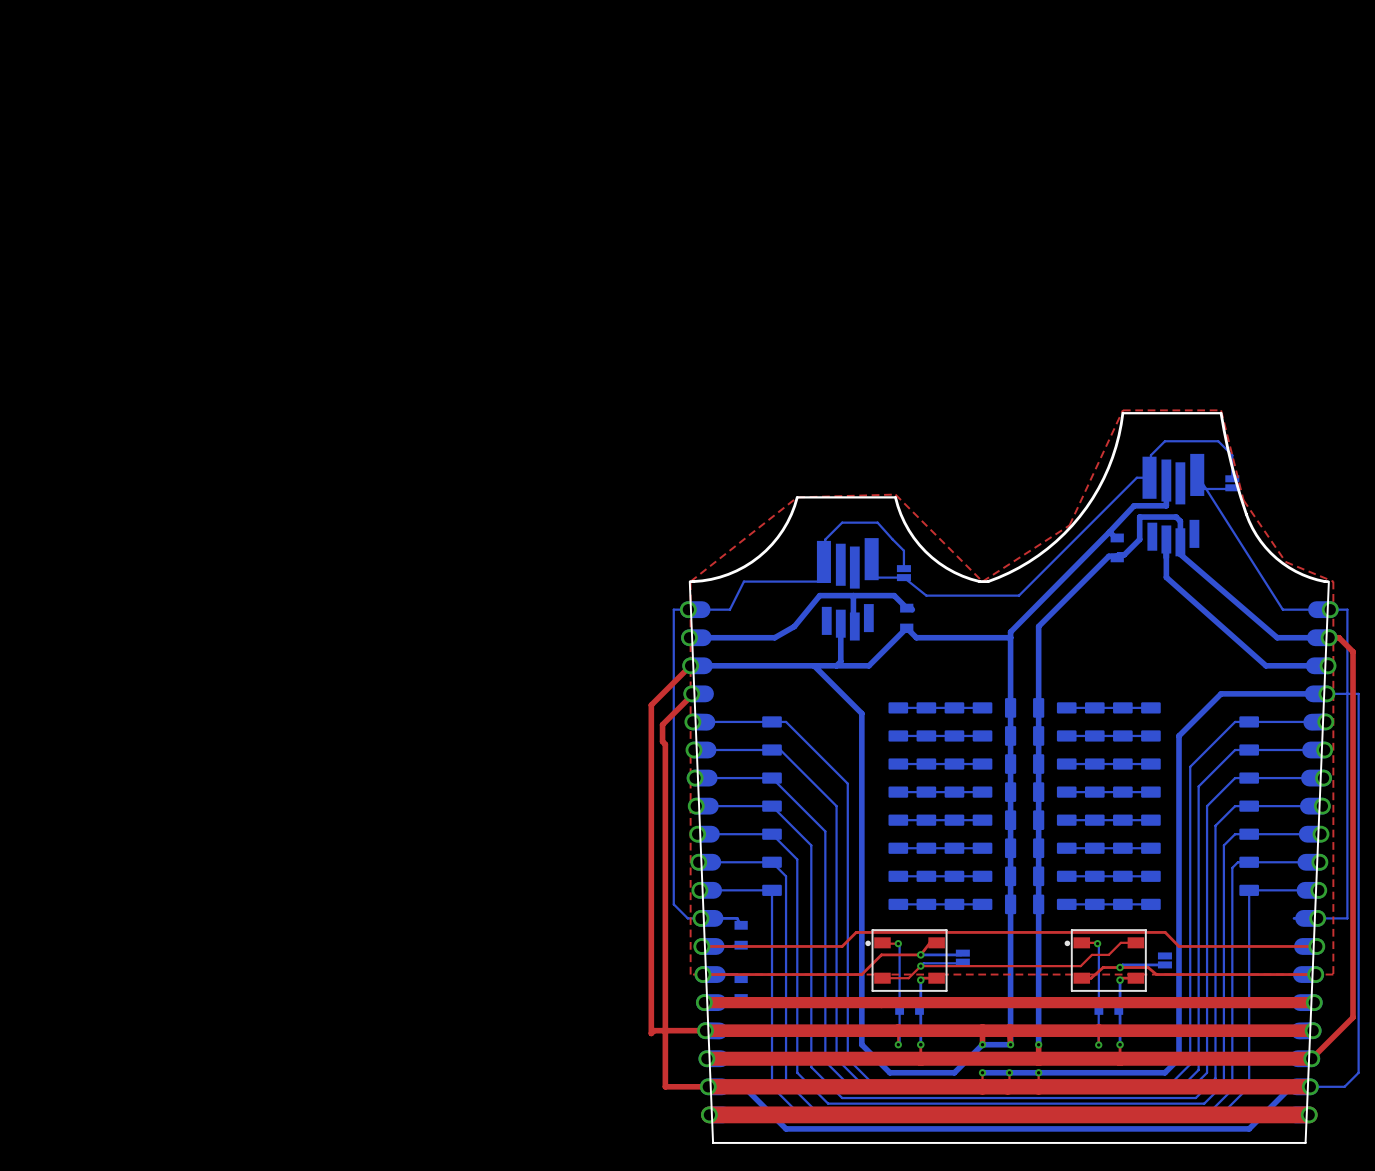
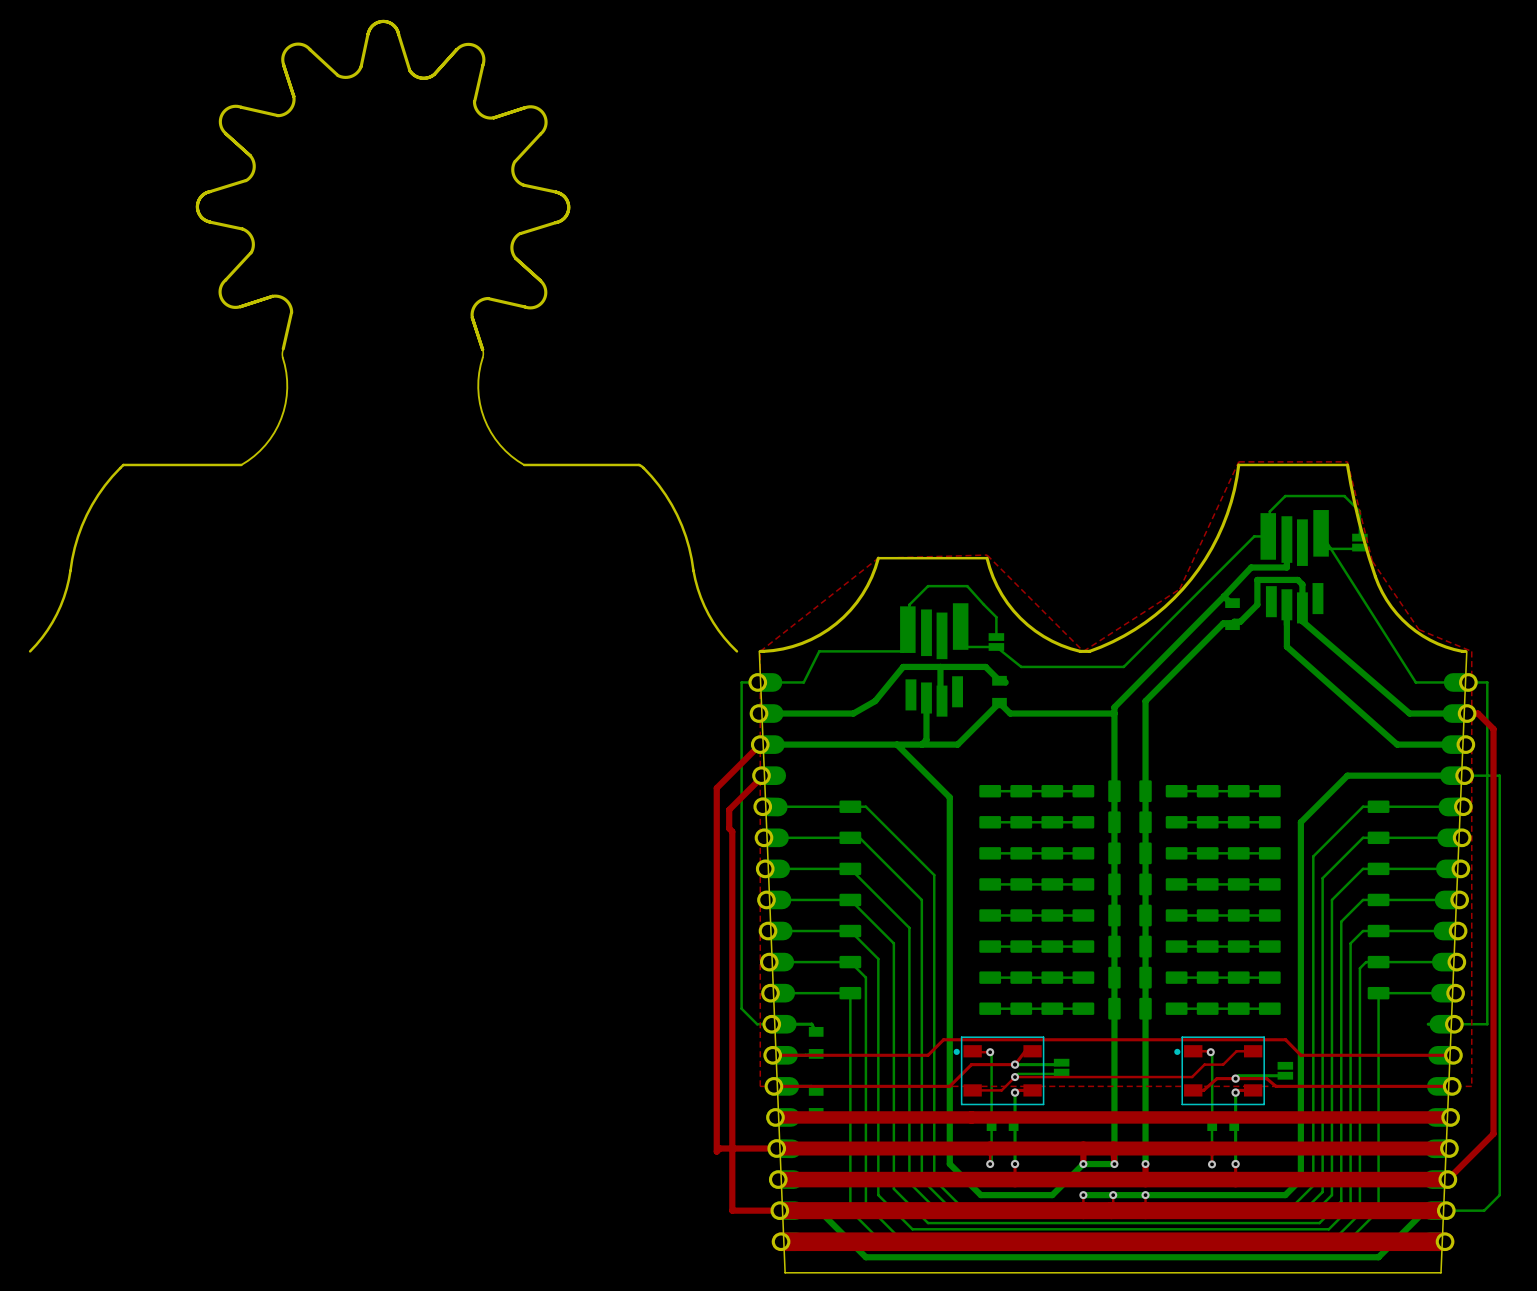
board edge: none -> (368, 33) (359, 70) (349, 77) (337, 75)
board edge: none -> (398, 34) (409, 69)
board edge: none -> (398, 34) (392, 24) (383, 21) (374, 24) (368, 34) (370, 28) (374, 24) (379, 21) (383, 21) (387, 21) (392, 24) (396, 28) (398, 34)
board edge: none -> (456, 49) (434, 74)
board edge: none -> (456, 49) (463, 45) (472, 44) (479, 48) (483, 55) (483, 63) (474, 101)
board edge: none -> (283, 64) (294, 100) (288, 111) (277, 115)
board edge: none -> (283, 64) (282, 56) (286, 49) (292, 45) (300, 44) (307, 47) (337, 74)
board edge: none -> (434, 74) (429, 77) (420, 78) (413, 74) (409, 70) (411, 73) (413, 74) (416, 76) (420, 78) (424, 78) (429, 77) (432, 75) (434, 74)
board edge: none -> (474, 101) (478, 112) (489, 118) (525, 107)
board edge: none -> (525, 107) (533, 106) (540, 110) (544, 116) (545, 124) (543, 131) (515, 161)
board edge: none -> (277, 115) (239, 106) (231, 106) (224, 110) (220, 117) (221, 127) (225, 133)
board edge: none -> (225, 133) (252, 159) (253, 171) (246, 180)
board edge: none -> (514, 161) (513, 173) (519, 183) (556, 192)
board edge: none -> (245, 180) (210, 191)
board edge: none -> (210, 191) (200, 197) (197, 206) (200, 215) (210, 222) (204, 219) (200, 215) (197, 210) (197, 206) (197, 202) (200, 197) (204, 193) (210, 191)
board edge: none -> (209, 222) (246, 230) (252, 240) (251, 252)
board edge: none -> (555, 222) (520, 233)
board edge: none -> (555, 222) (565, 216) (568, 207) (565, 198) (556, 192) (561, 194) (565, 198) (568, 203) (568, 207) (568, 211) (565, 216) (561, 220) (555, 222)
board edge: none -> (520, 233) (512, 242) (513, 254) (540, 280)
board edge: none -> (250, 253) (223, 282) (220, 290) (221, 297) (225, 304) (232, 307) (240, 306)
board edge: none -> (540, 280) (544, 287) (545, 296) (541, 303) (534, 307) (526, 307) (489, 298)
board edge: none -> (488, 298) (477, 302) (472, 313) (482, 349)
board edge: none -> (240, 306) (276, 296) (287, 301) (291, 312)
board edge: none -> (291, 313) (283, 348)
board edge: none -> (283, 349) (282, 356) (287, 388) (283, 411) (270, 439) (247, 460) (241, 464) (123, 464) (112, 476) (92, 504) (82, 525) (74, 547) (66, 588) (56, 614) (47, 630) (30, 651)
board edge: none -> (482, 349) (478, 380) (479, 403) (487, 425) (500, 445) (524, 464) (639, 464) (642, 467) (659, 485) (677, 515) (685, 536) (695, 579) (704, 606) (718, 630) (736, 651)

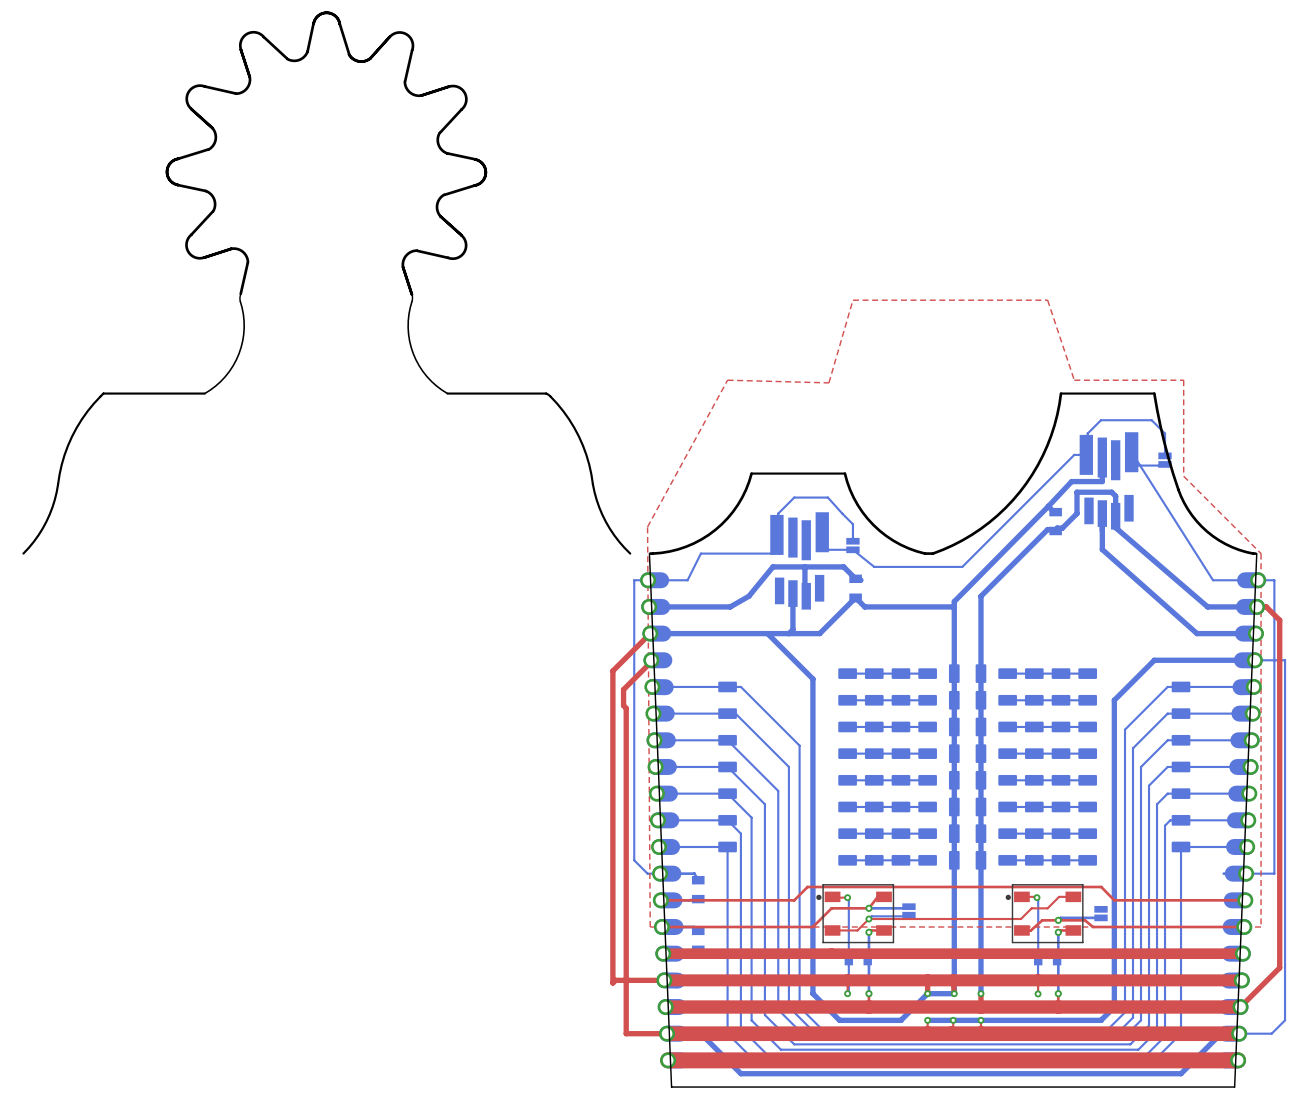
top zone outline: (1471, 651) (1418, 629) (1372, 561) (1347, 461) (1238, 461) (1179, 589) (1083, 651) (987, 555) (878, 558) (760, 651) (760, 1086) -> (1261, 553) (1183, 476) (1183, 380) (1074, 380) (1047, 300) (852, 300) (828, 382) (727, 380) (647, 526) (650, 927)

